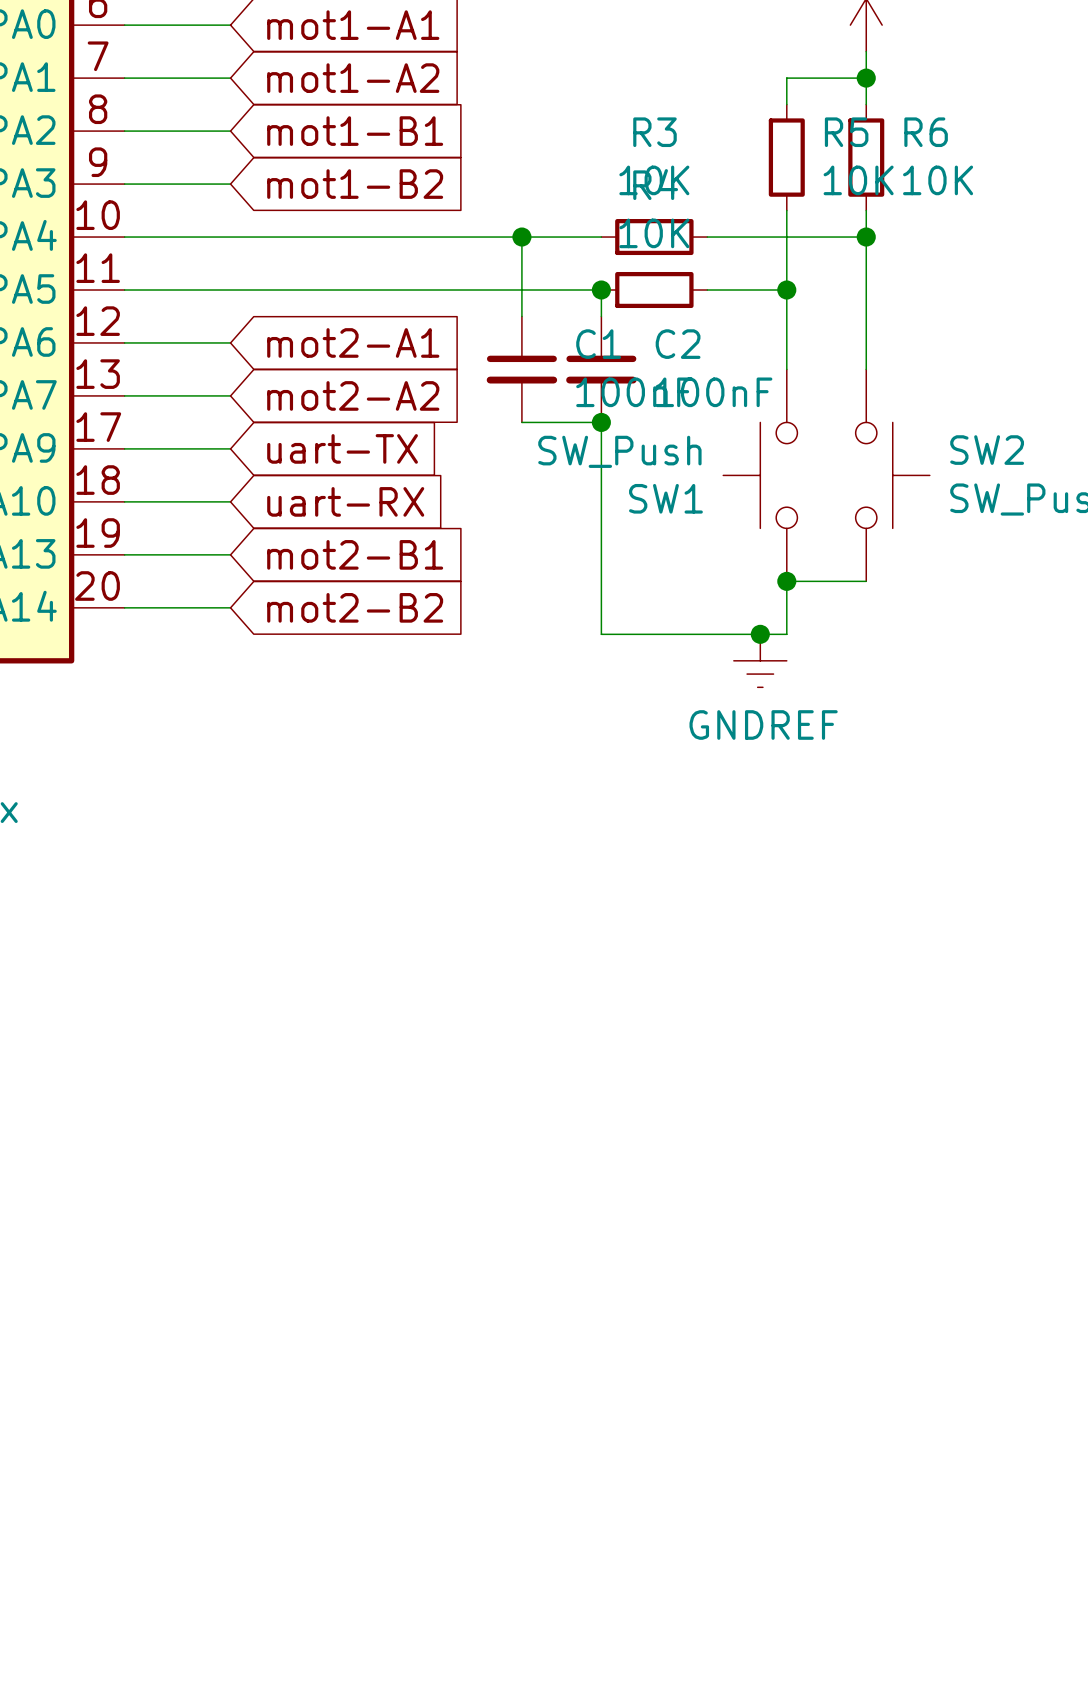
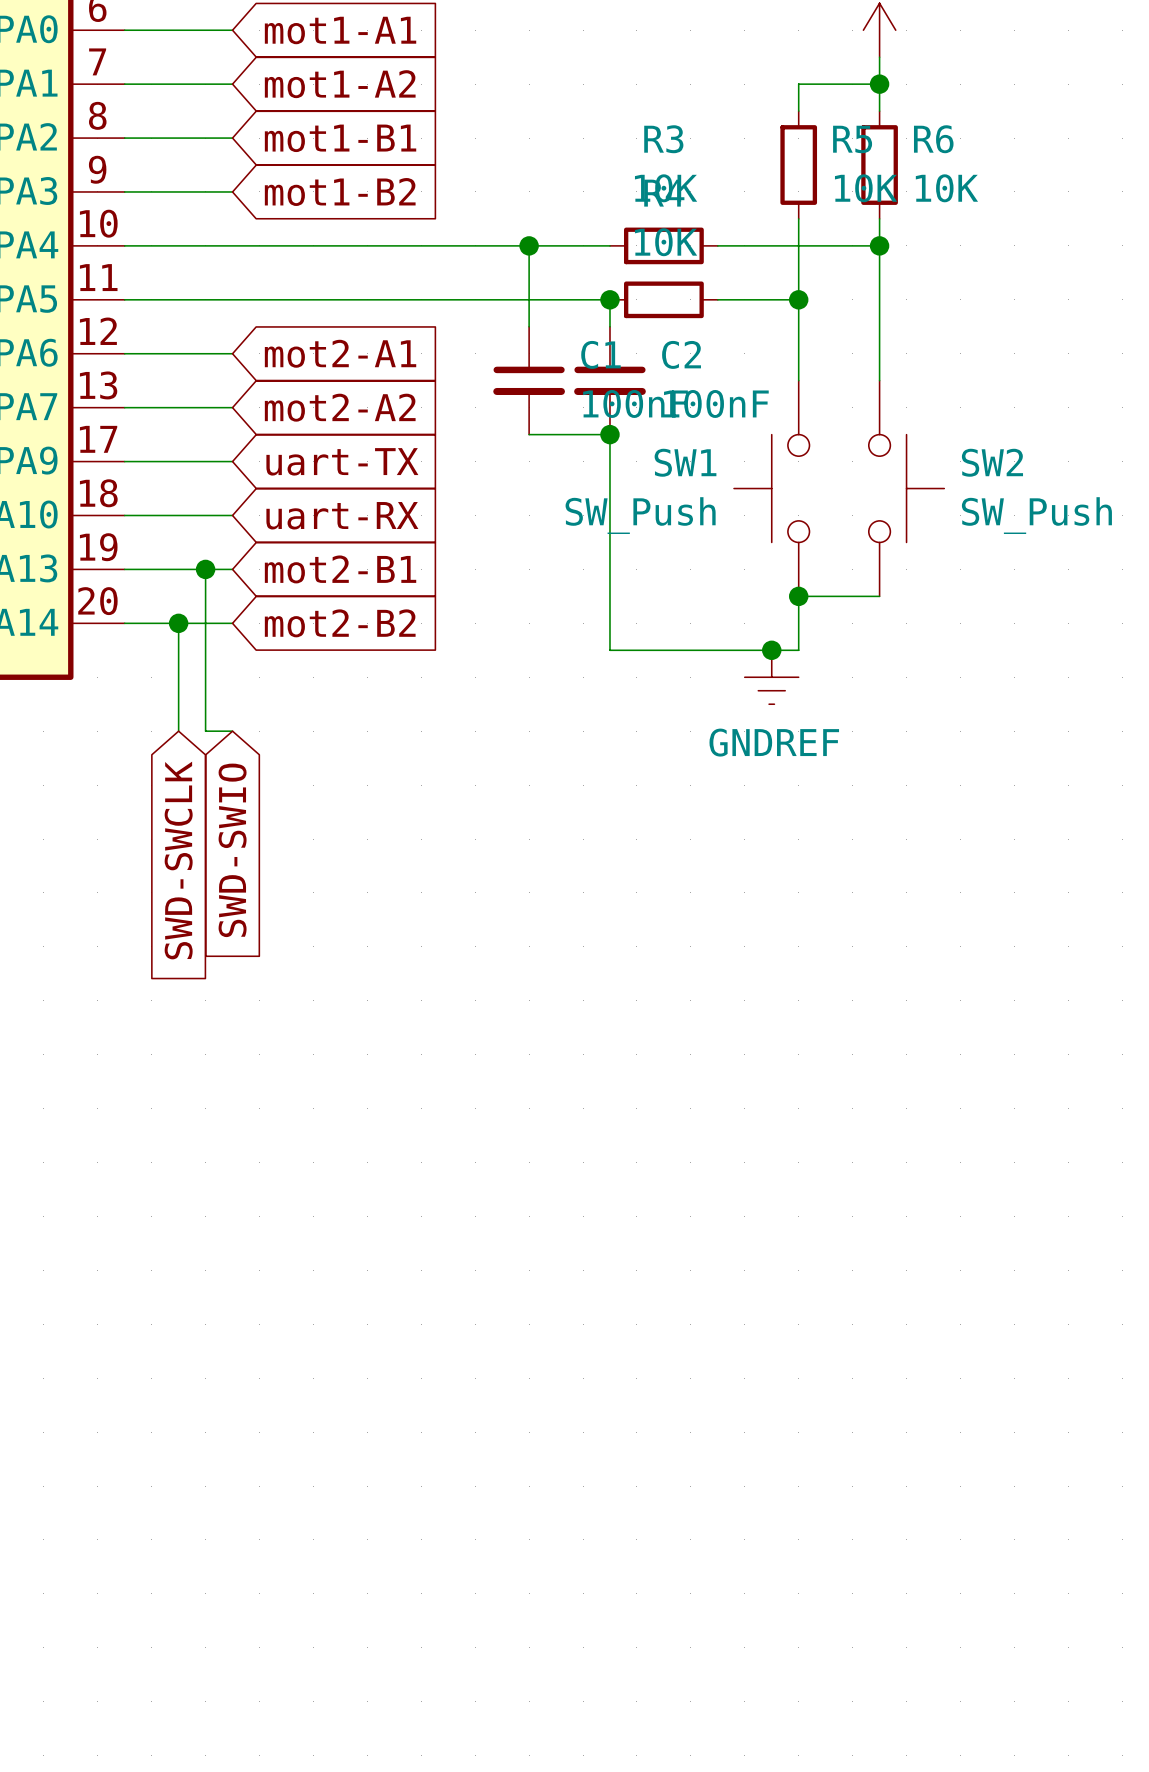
SW1 value position: SW_Push (619, 451) -> SW_Push (640, 515)
SW1 name position: SW1 (665, 498) -> SW1 (685, 462)
wire: none -> (205, 569) (205, 731) (232, 731)
junction: none -> (205, 569)
wire: none -> (178, 623) (178, 731)
junction: none -> (178, 623)
global label: none -> SWD-SWIO (232, 850)
global label: none -> SWD-SWCLK (178, 860)

